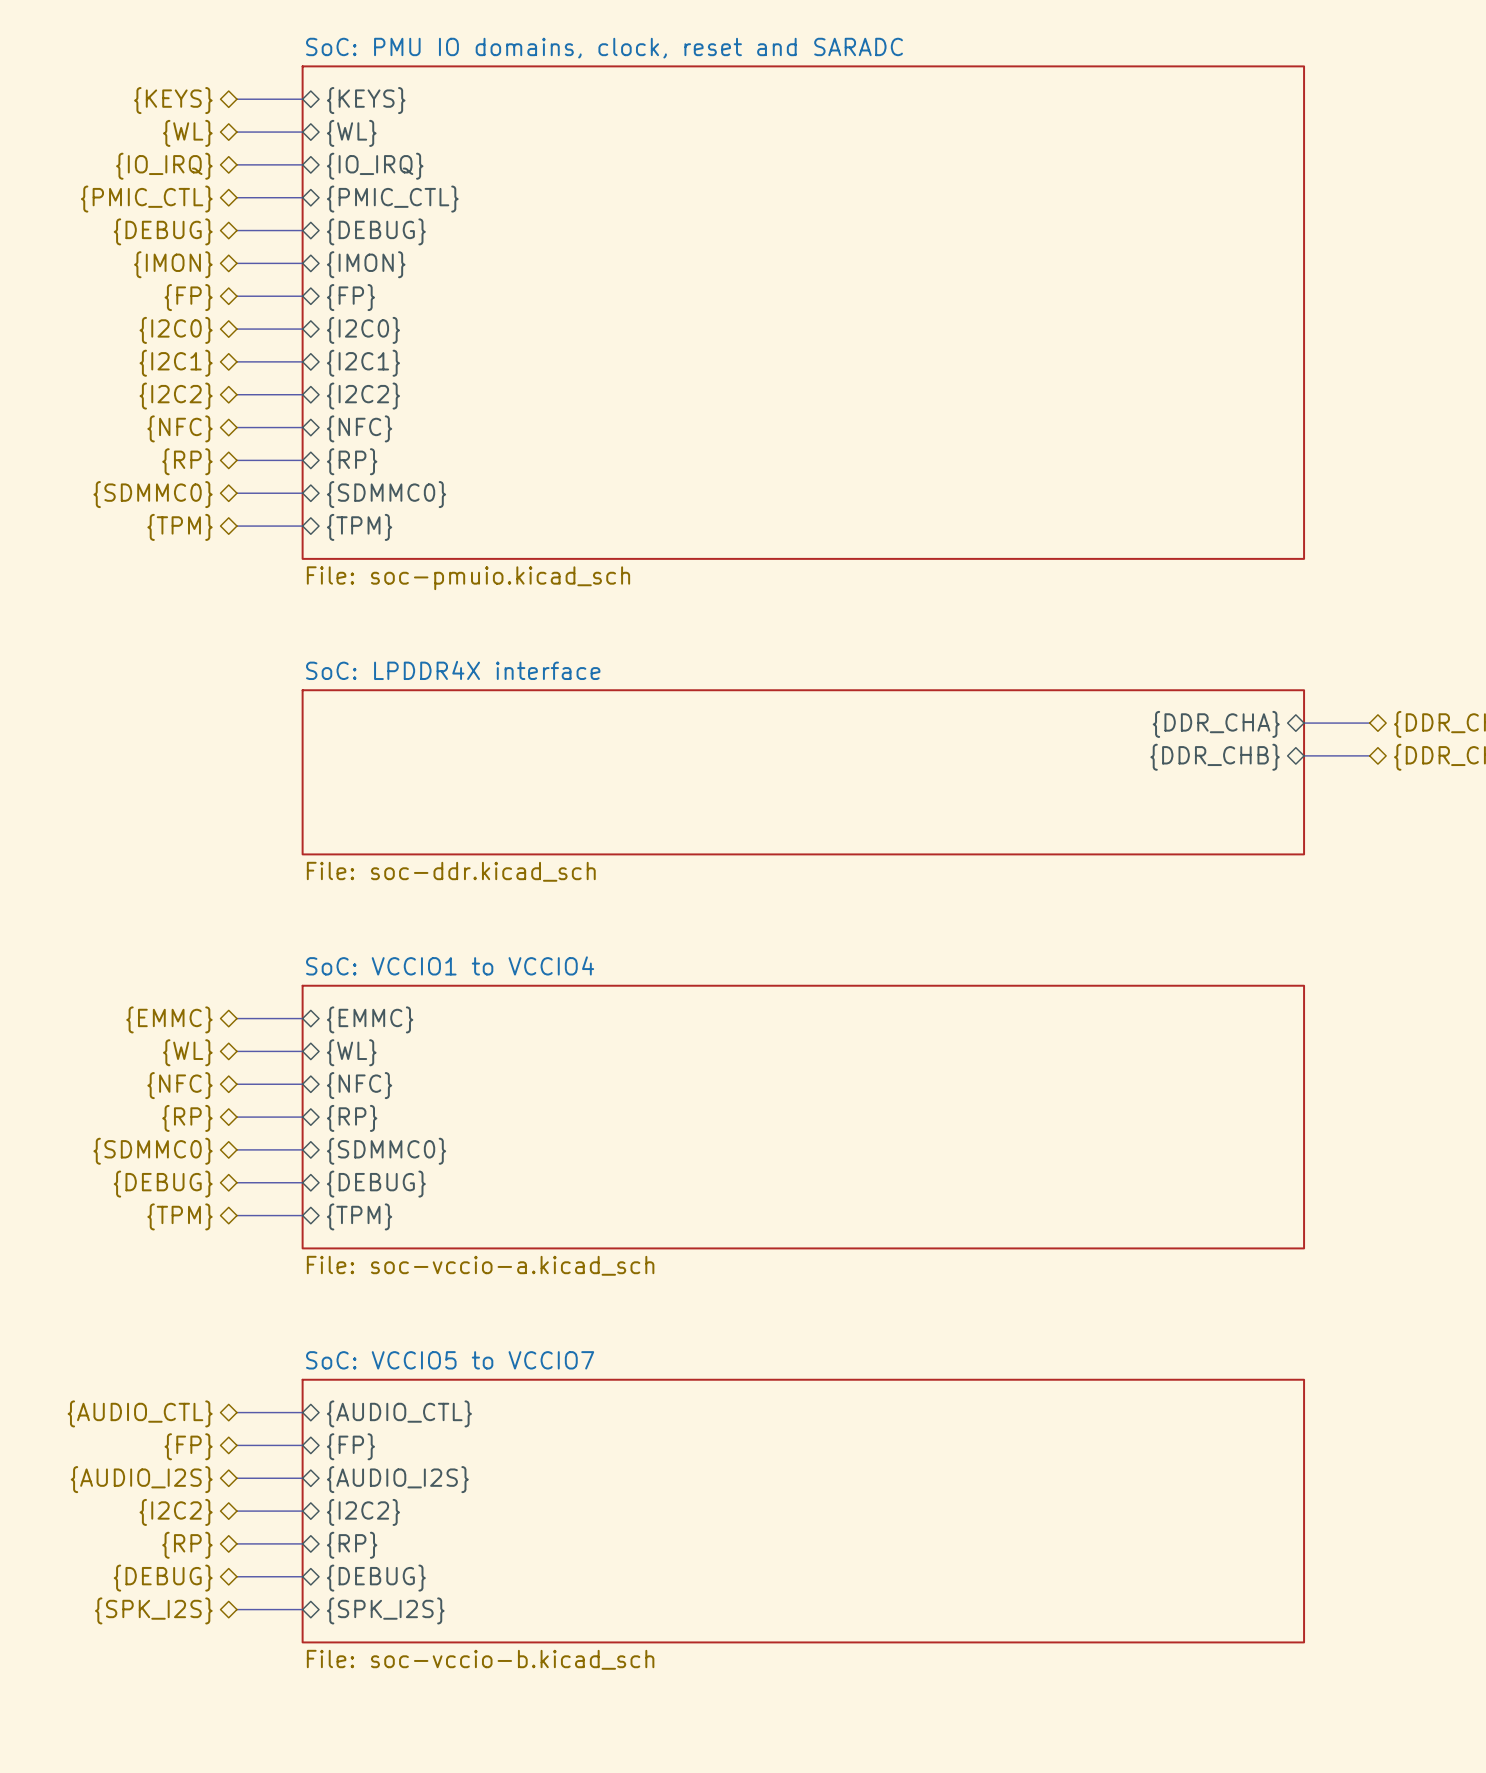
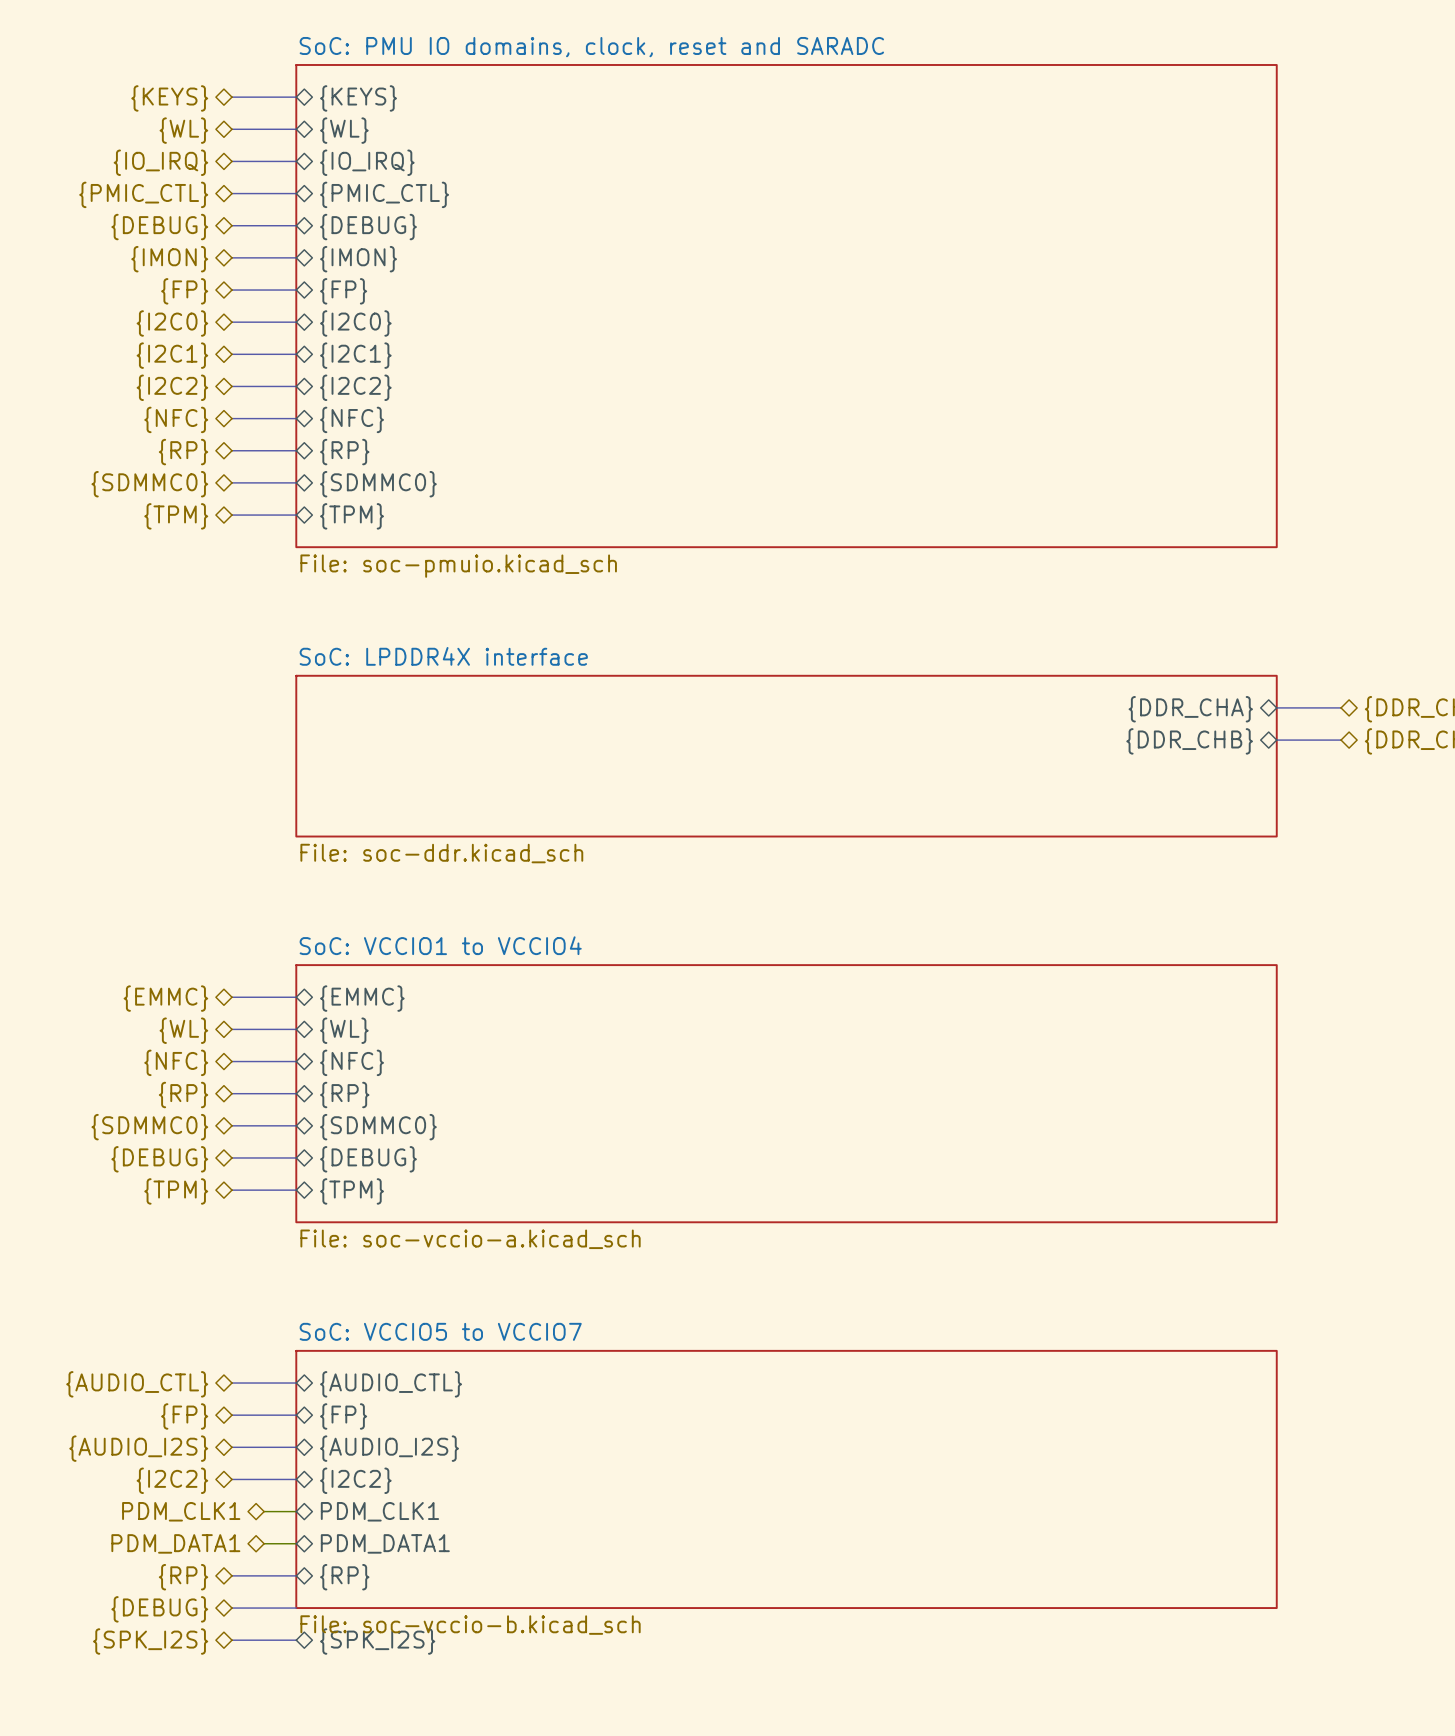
bus: (236, 1543) (302, 1543) -> (231, 1608) (296, 1608)
hierarchical label: none -> PDM_CLK1 (181, 1511)
hierarchical label: {RP} (187, 1545) -> none
sheet pin: {RP} (352, 1545) -> PDM_CLK1 (379, 1511)
hierarchical label: none -> PDM_DATA1 (175, 1543)
bus: (236, 1576) (302, 1576) -> (231, 1640) (296, 1640)
hierarchical label position: {DEBUG} (163, 1578) -> {DEBUG} (159, 1609)
sheet pin: {DEBUG} (376, 1578) -> PDM_DATA1 (385, 1543)
hierarchical label: {SPK_I2S} (153, 1610) -> {RP} (183, 1577)
sheet pin: {SPK_I2S} (385, 1610) -> {RP} (344, 1577)
hierarchical label: none -> {SPK_I2S} (150, 1641)
sheet pin: none -> {SPK_I2S} (377, 1641)

